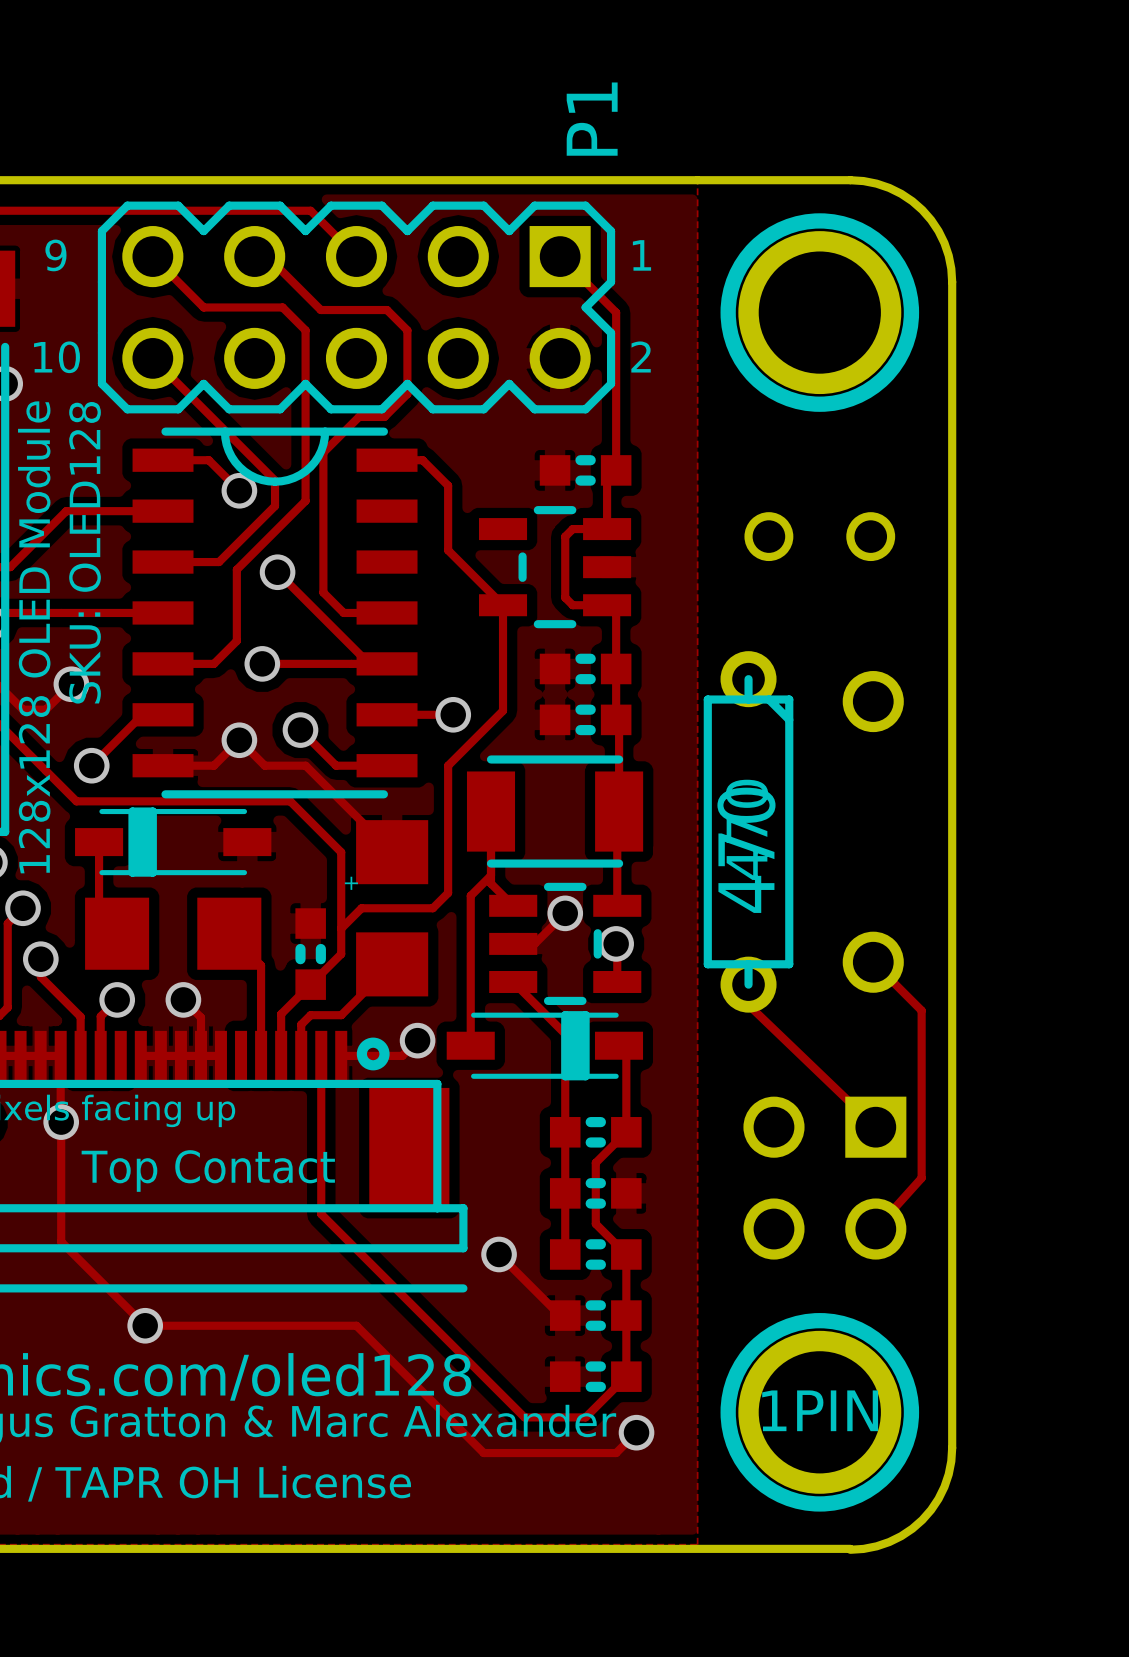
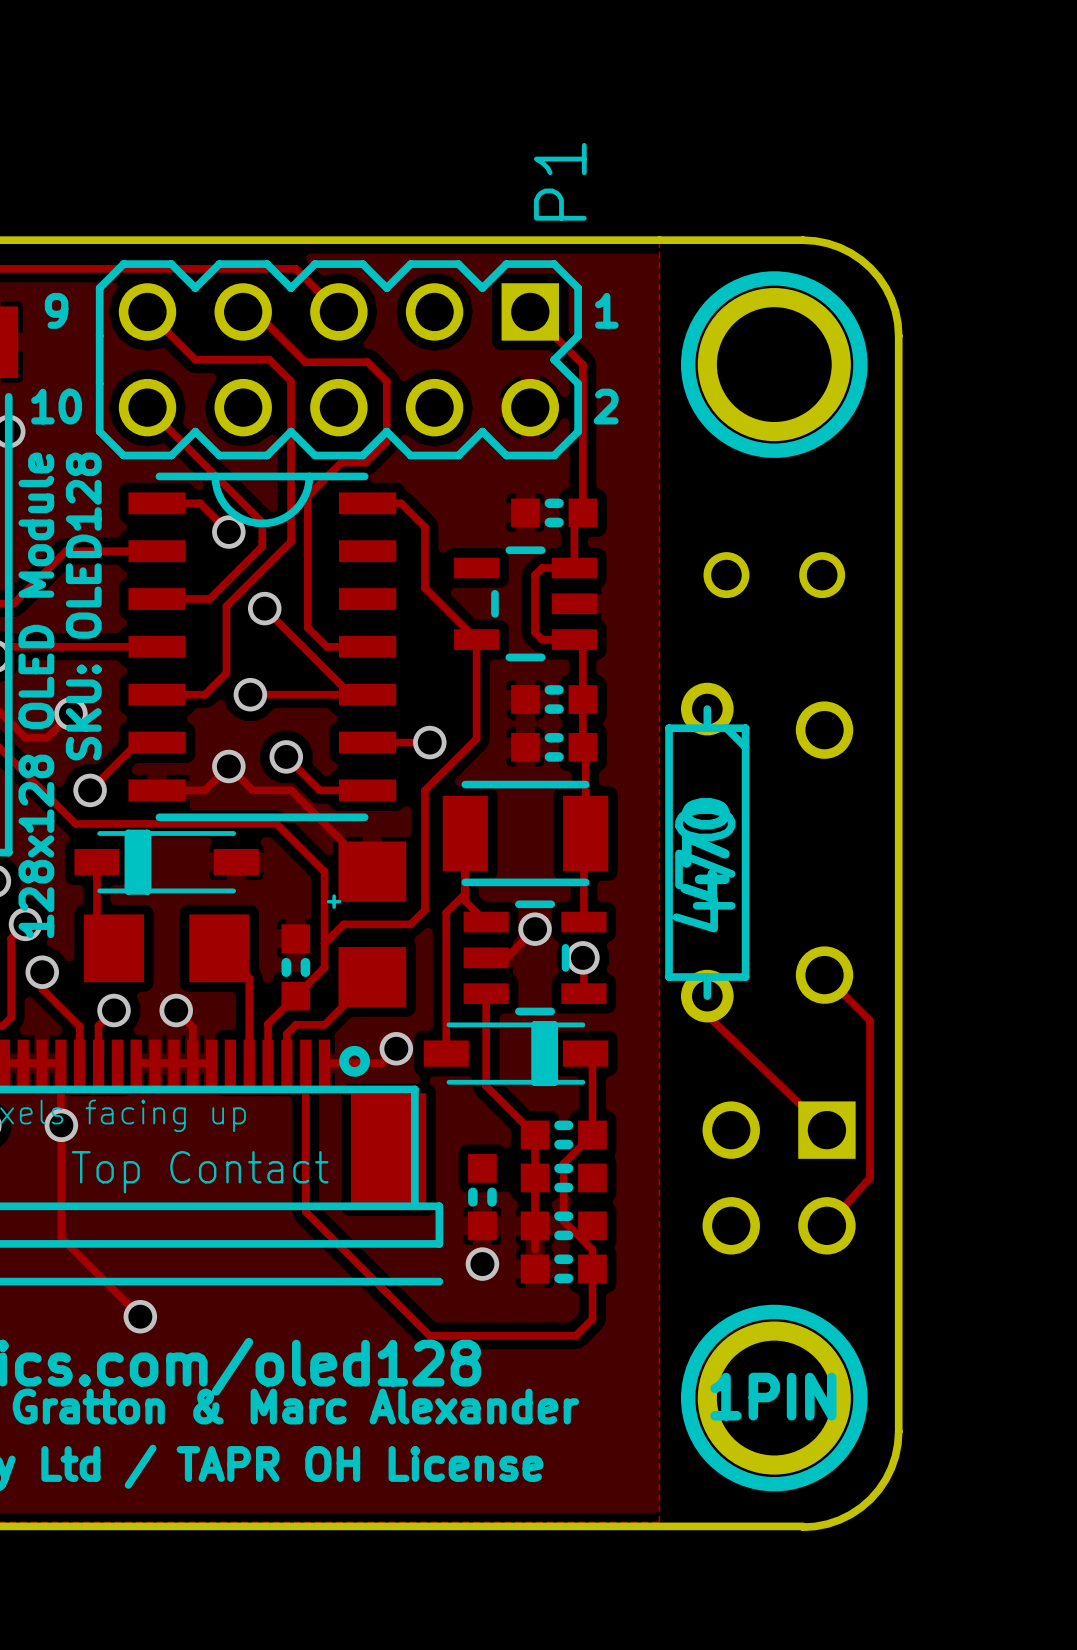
track: (513, 981) (565, 1034) (565, 1132) -> (486, 993) (486, 1086) (535, 1134)
part position: (595, 1193) -> (563, 1177)
part: none -> (482, 1197)
part: none -> (563, 1225)
track: (499, 1254) (560, 1315) (565, 1315) -> none
via position: (499, 1254) -> (482, 1264)
part: (595, 1254) -> none
part: none -> (563, 1268)
part: (595, 1315) -> none
track: (145, 1325) (356, 1325) (483, 1453) (616, 1453) (636, 1432) -> none
track: (626, 1328) (626, 1376) (585, 1417) (524, 1417) (453, 1346) -> (592, 1319) (575, 1335) (429, 1335)
part: (595, 1376) -> none
via: (636, 1432) -> none

